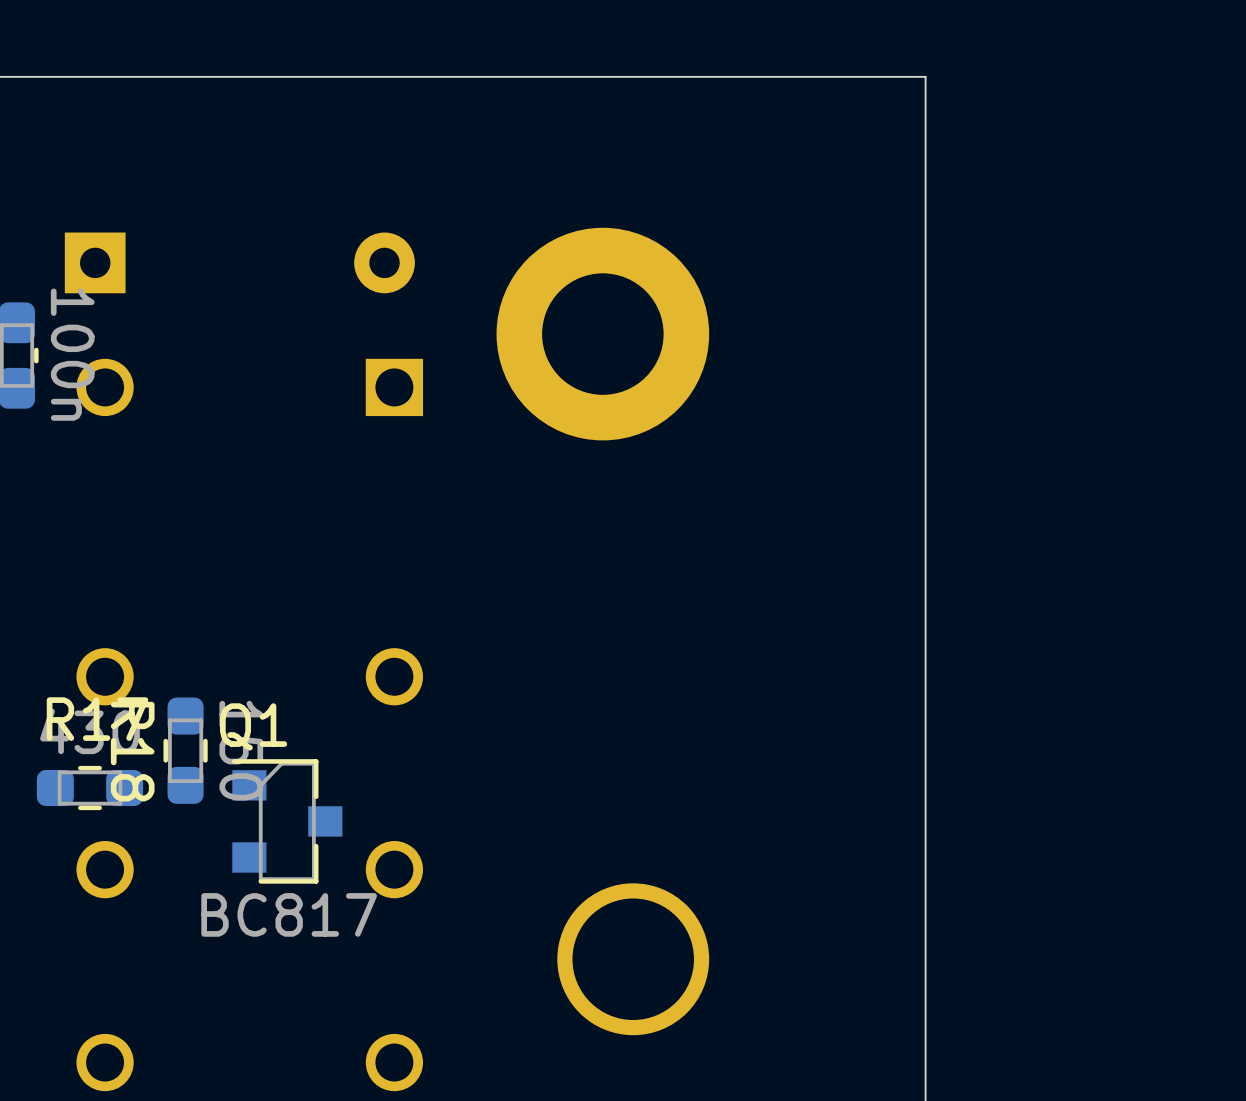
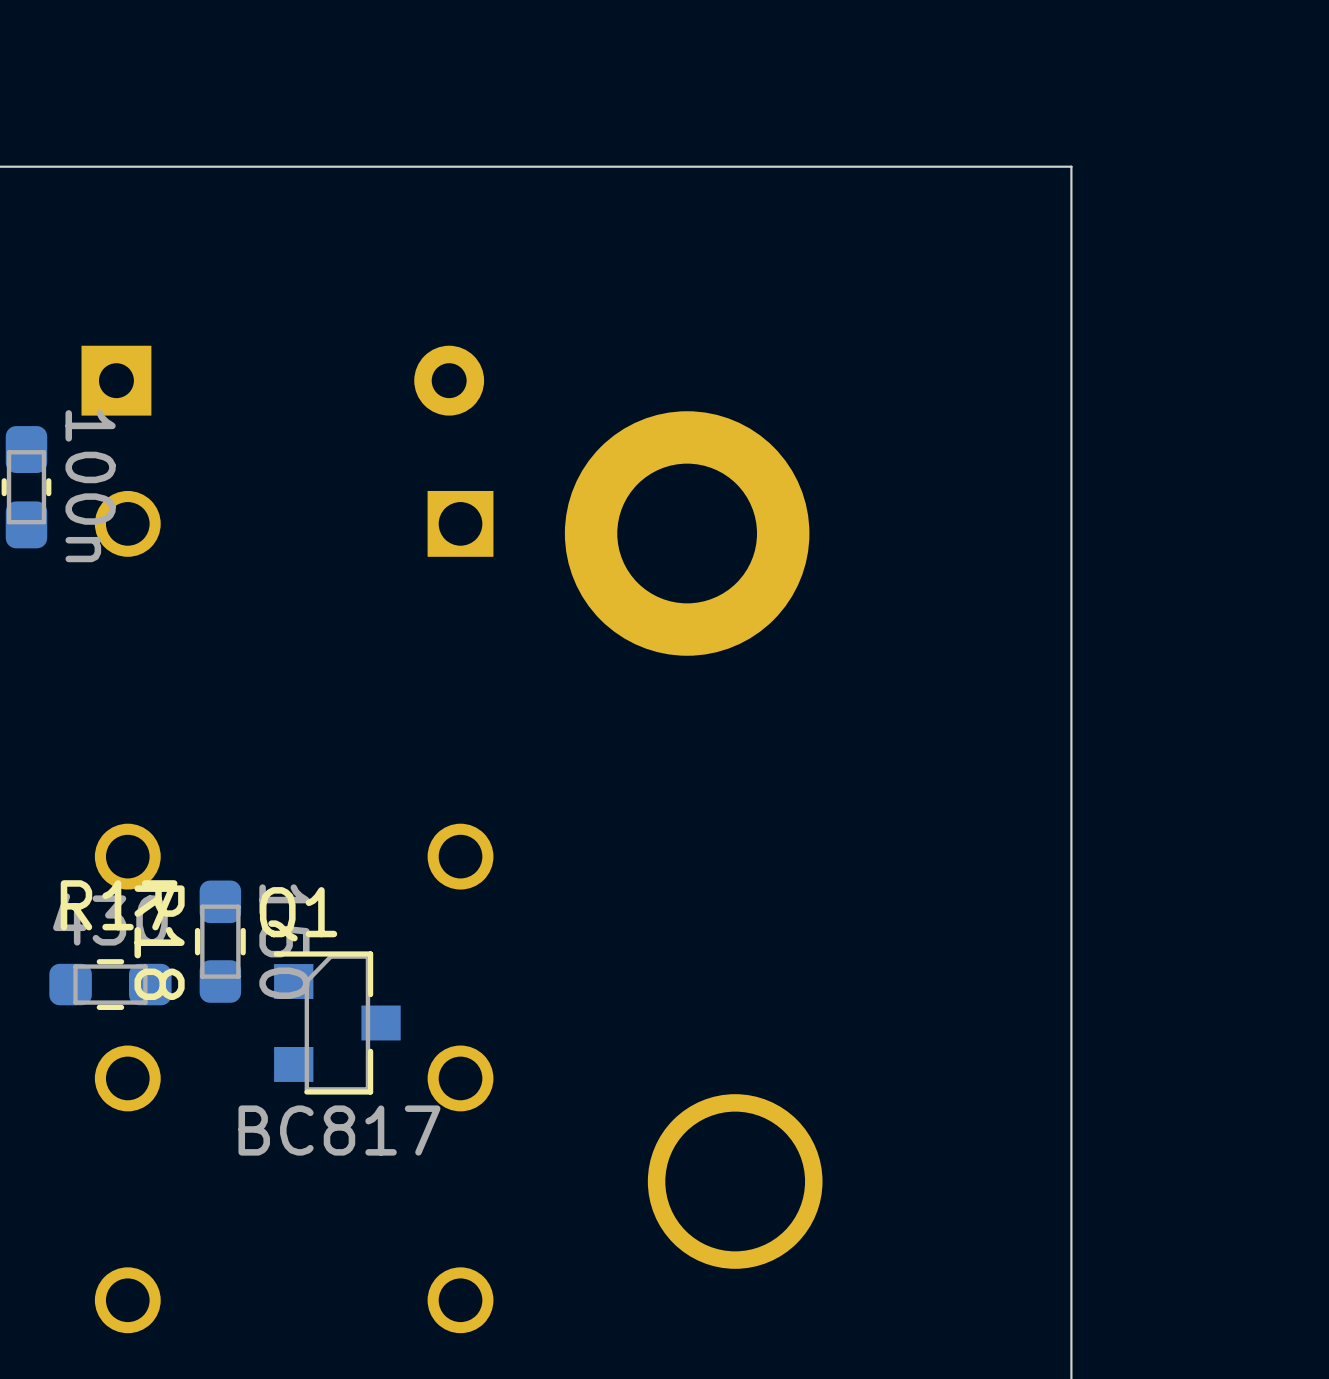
part position: (602, 334) -> (687, 533)

